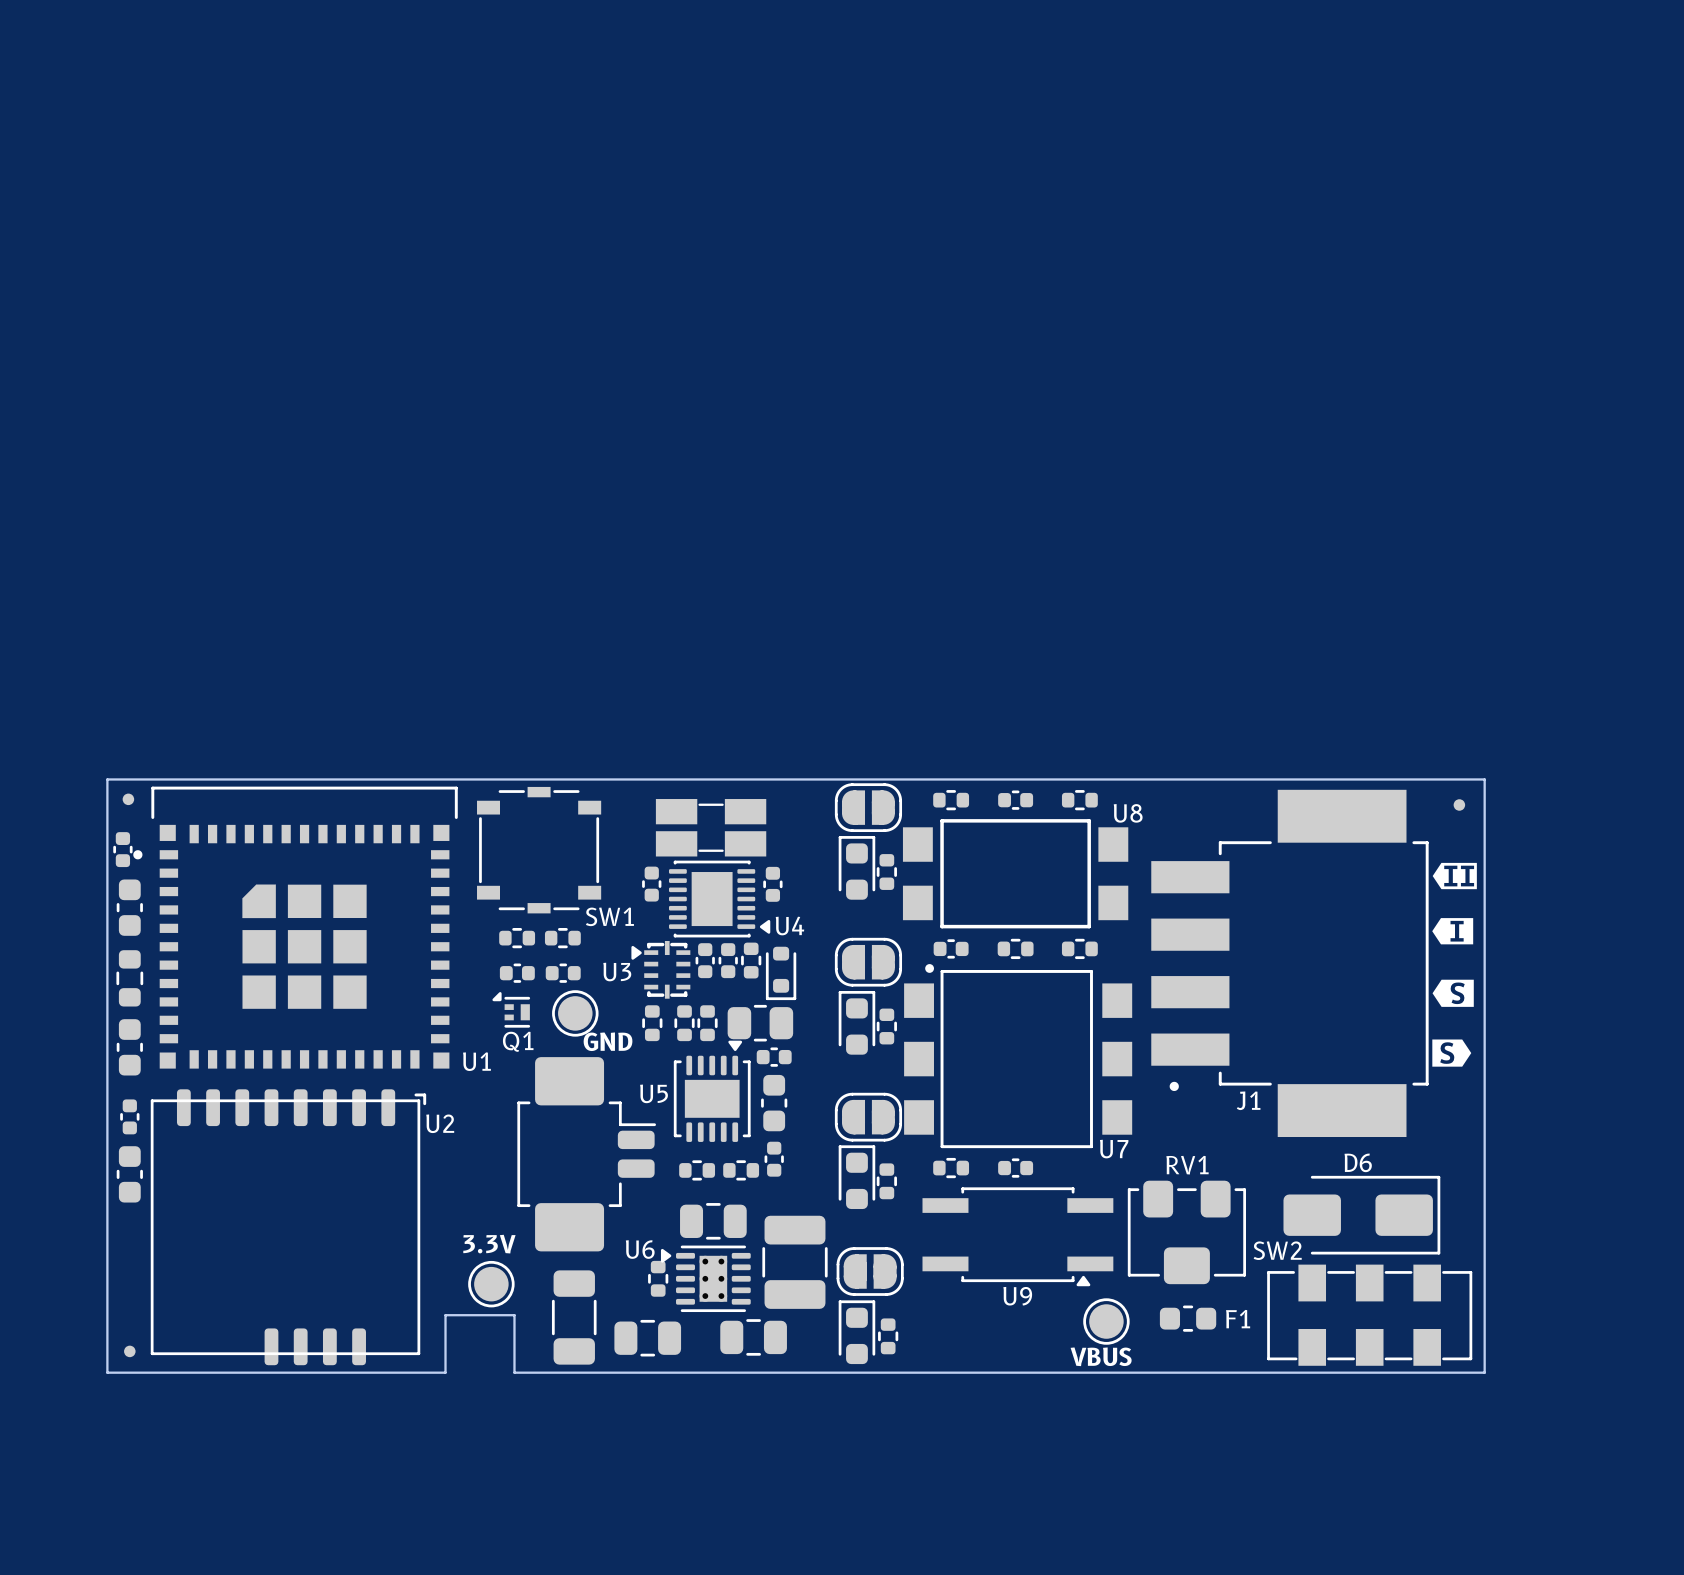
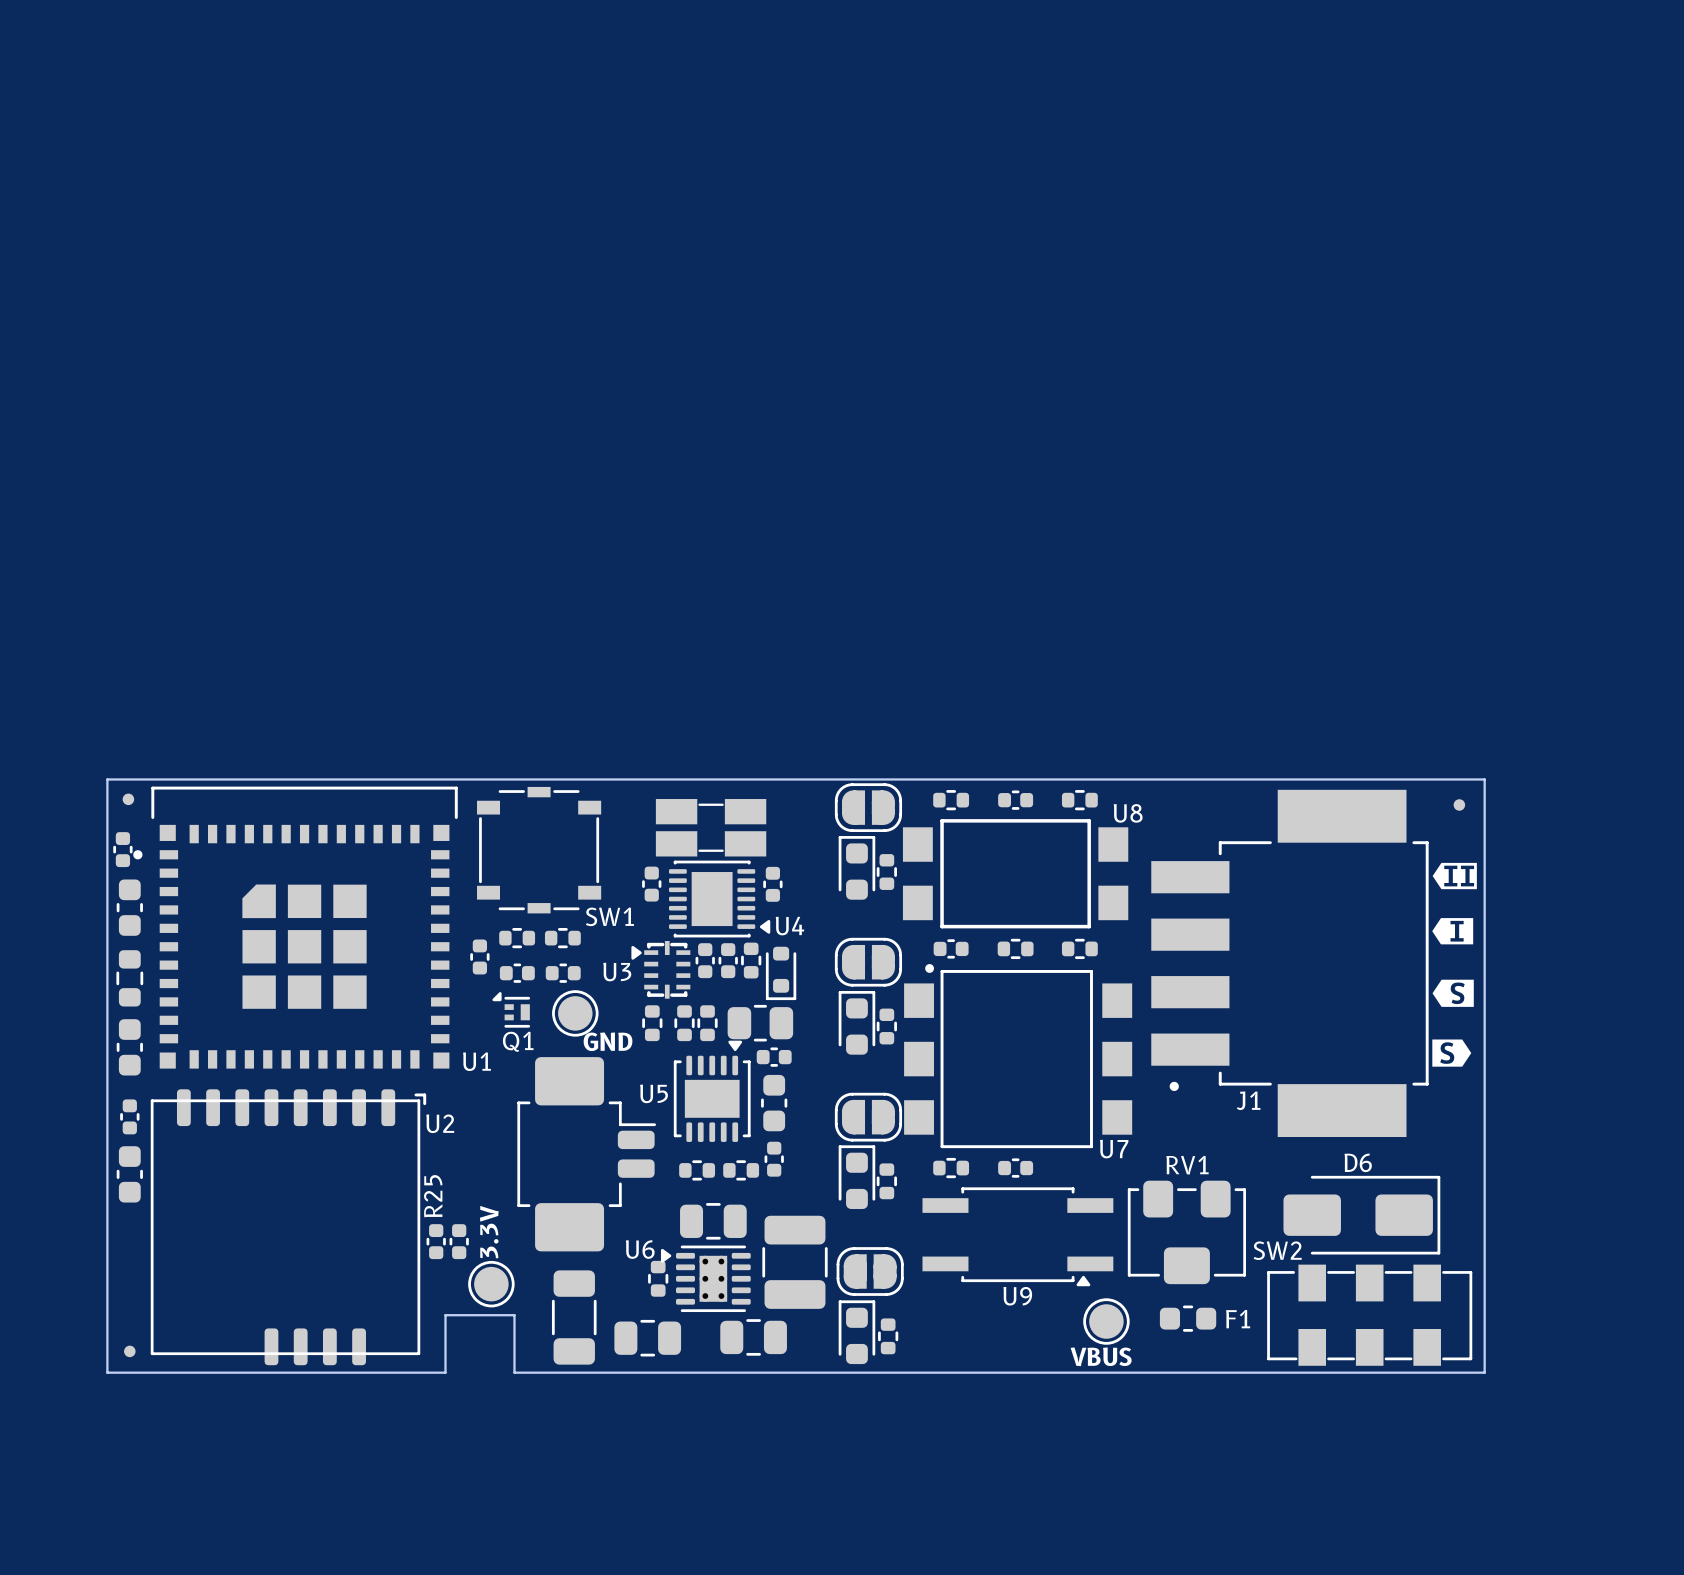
part: none -> (479, 956)
R25: none -> (436, 1241)
part: none -> (459, 1241)
text rotation: 0° (489, 1244) -> 90° counterclockwise (489, 1232)

